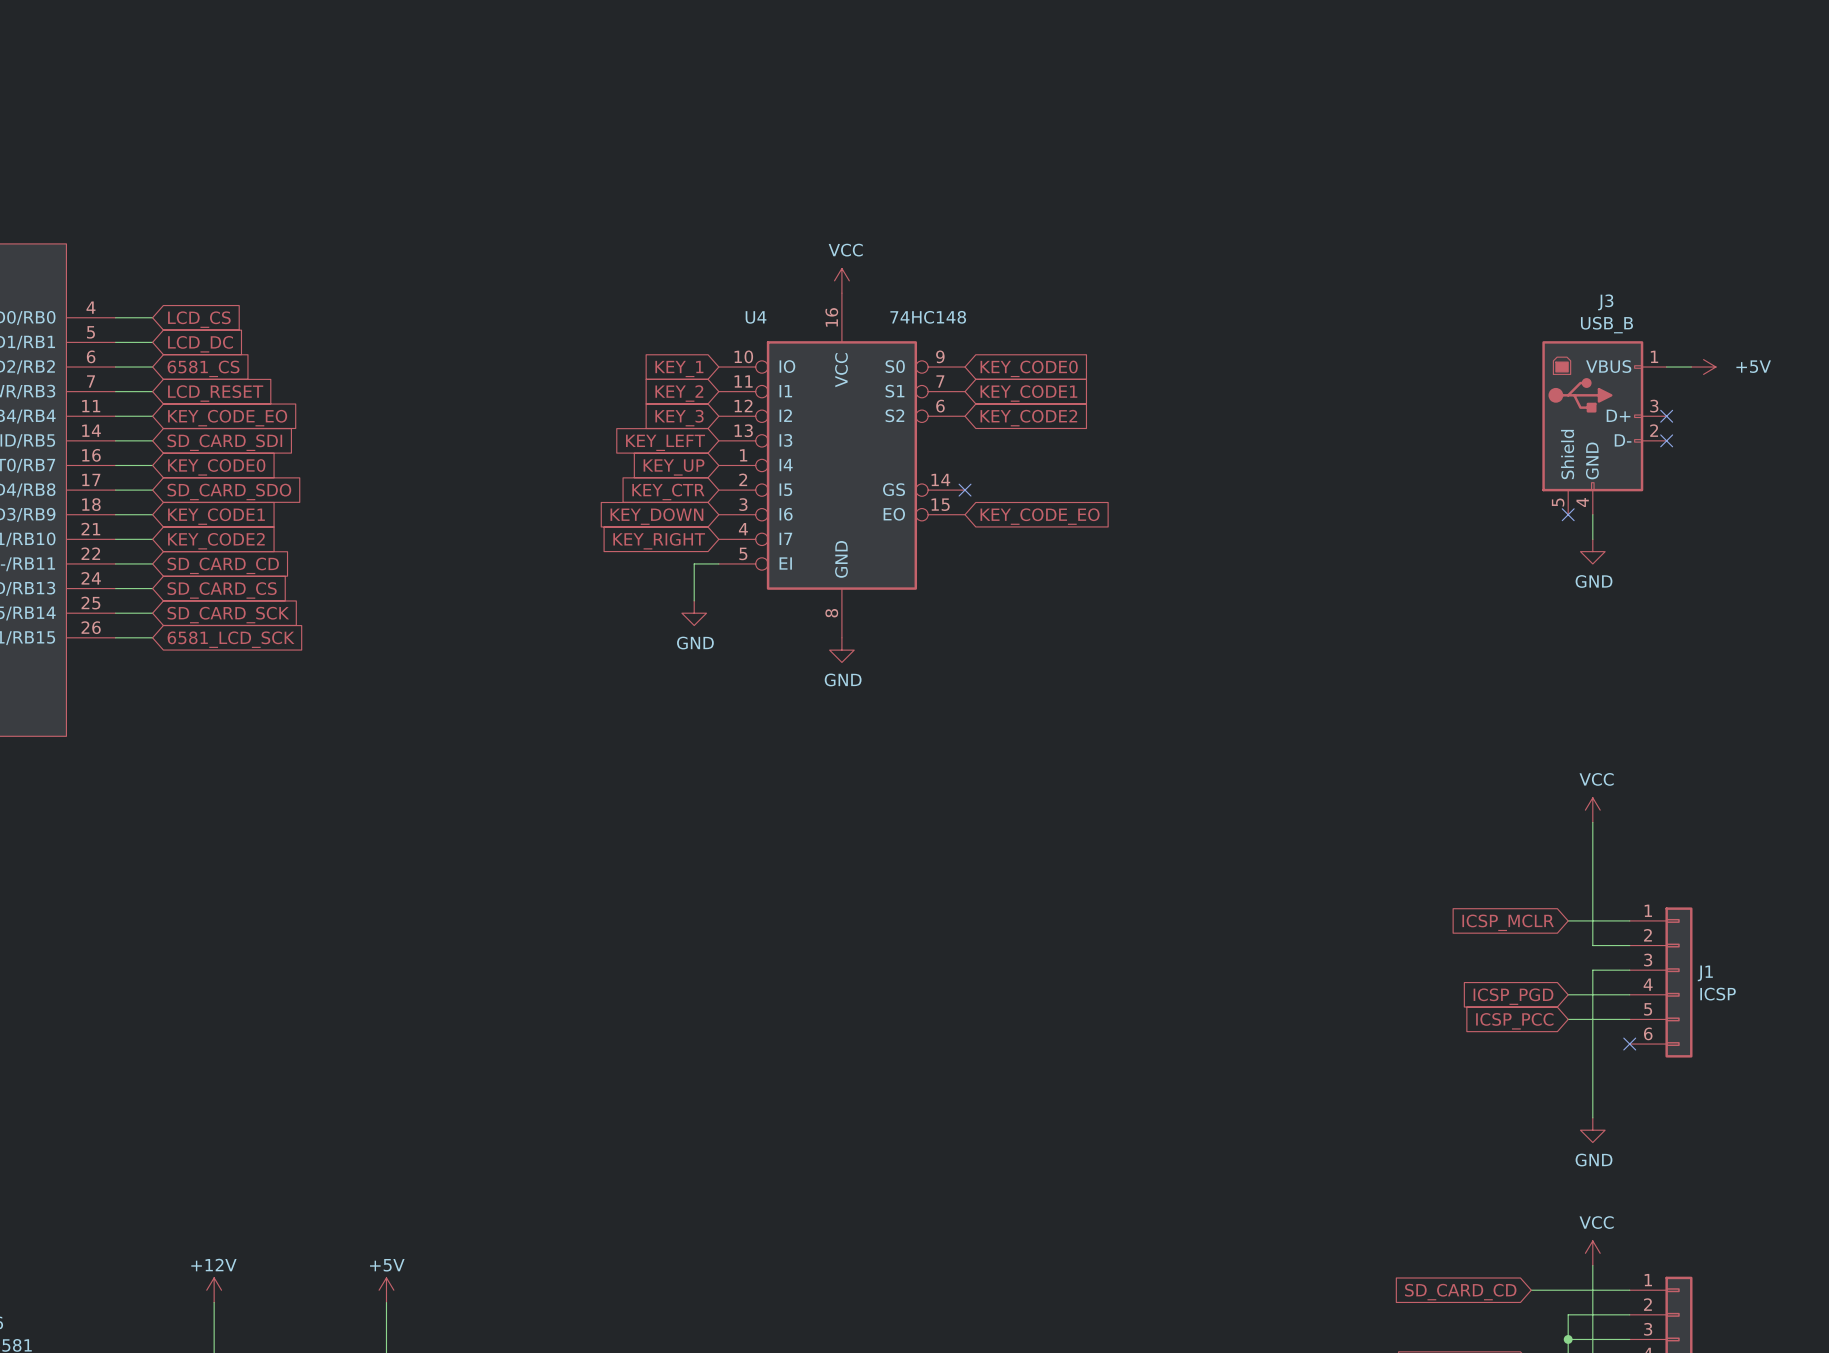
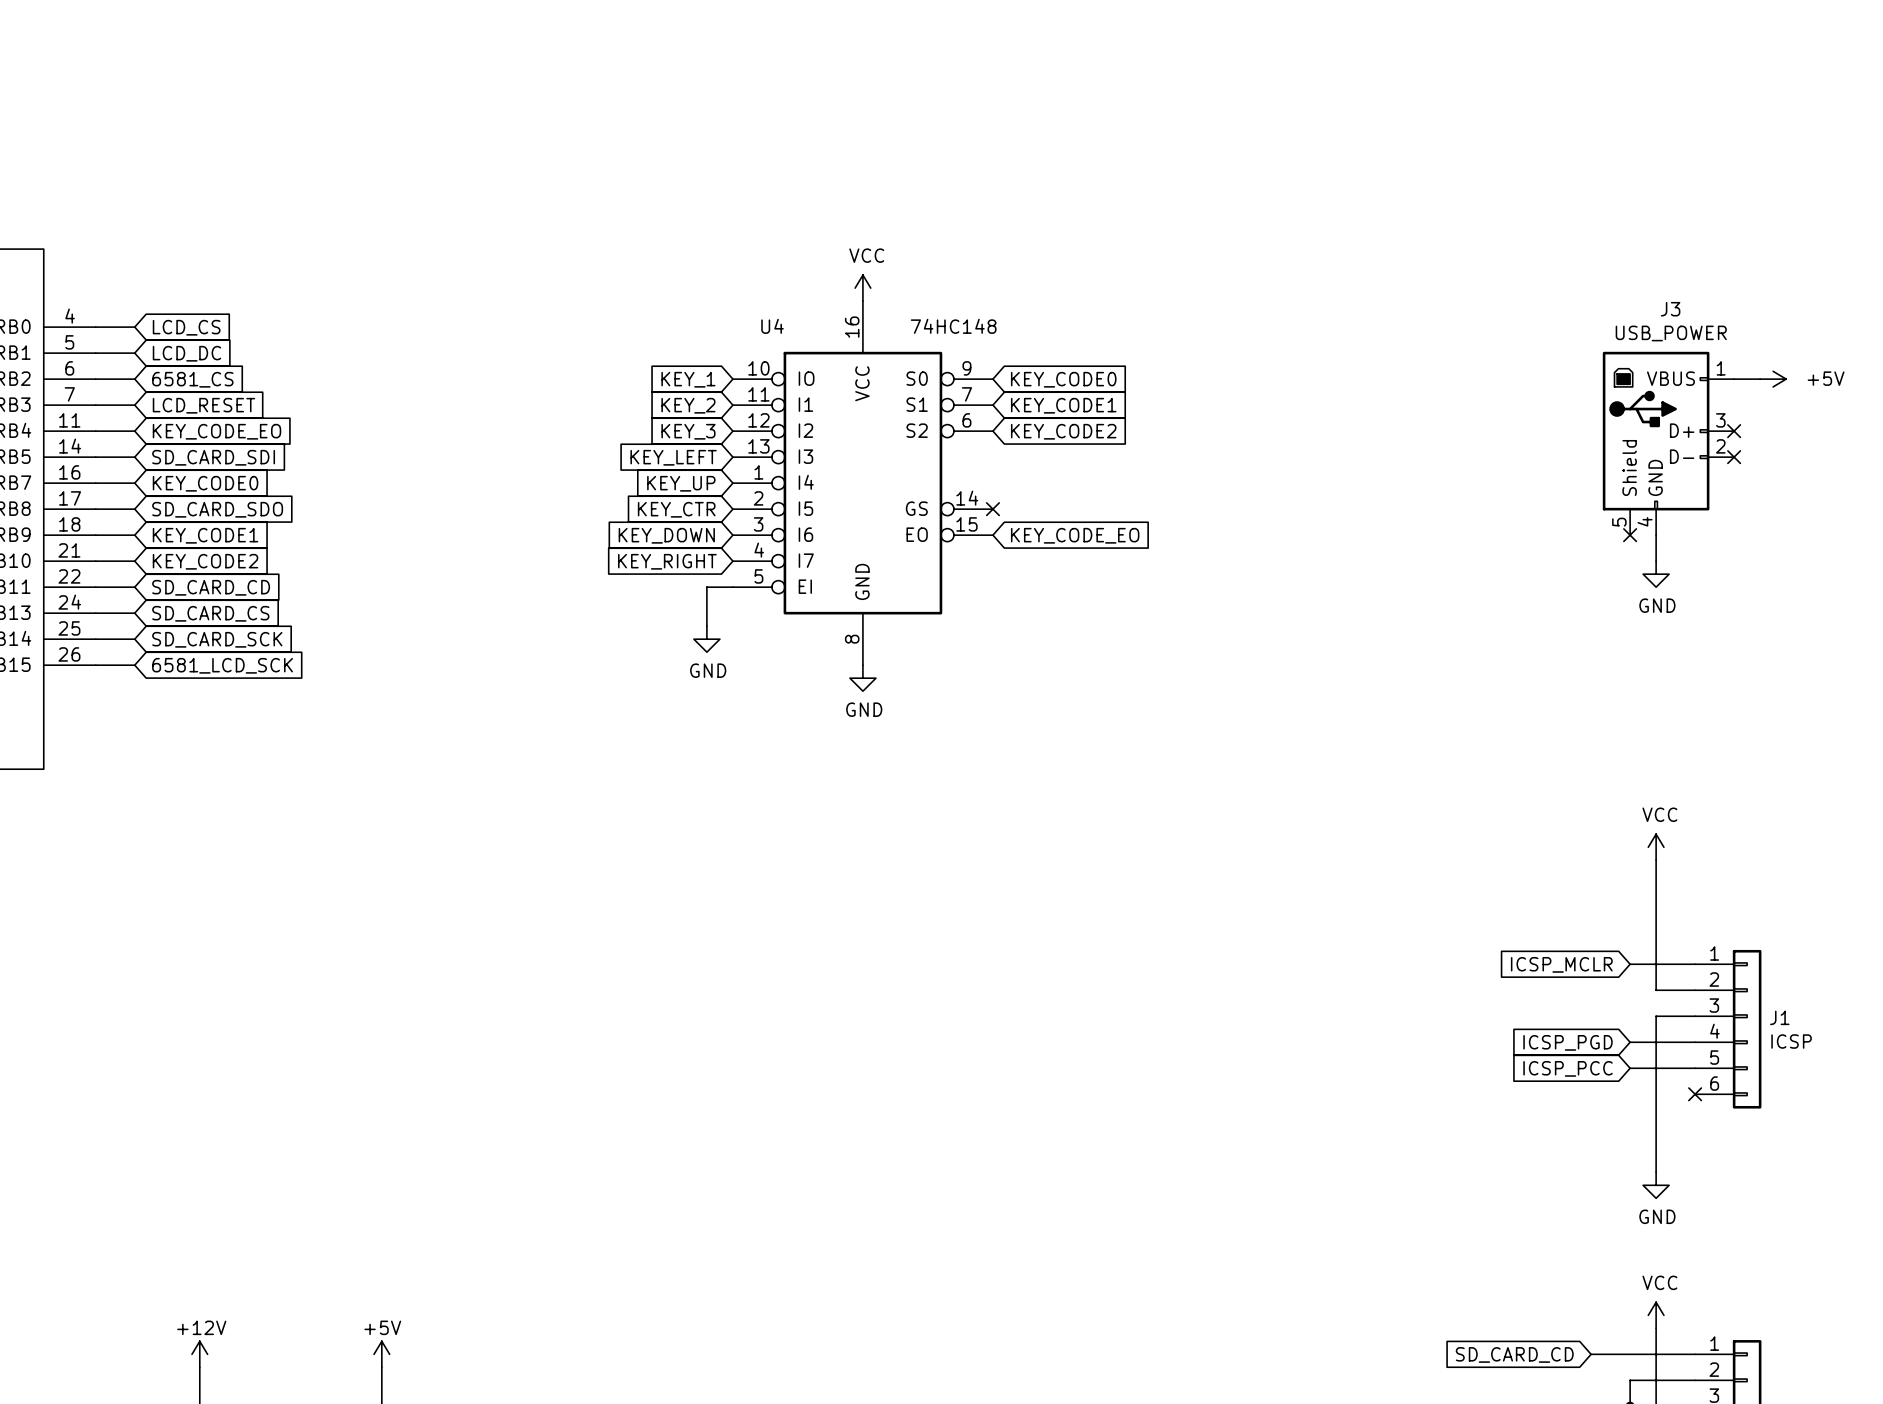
J3 value: USB_B (1606, 325) -> USB_POWER (1671, 333)

